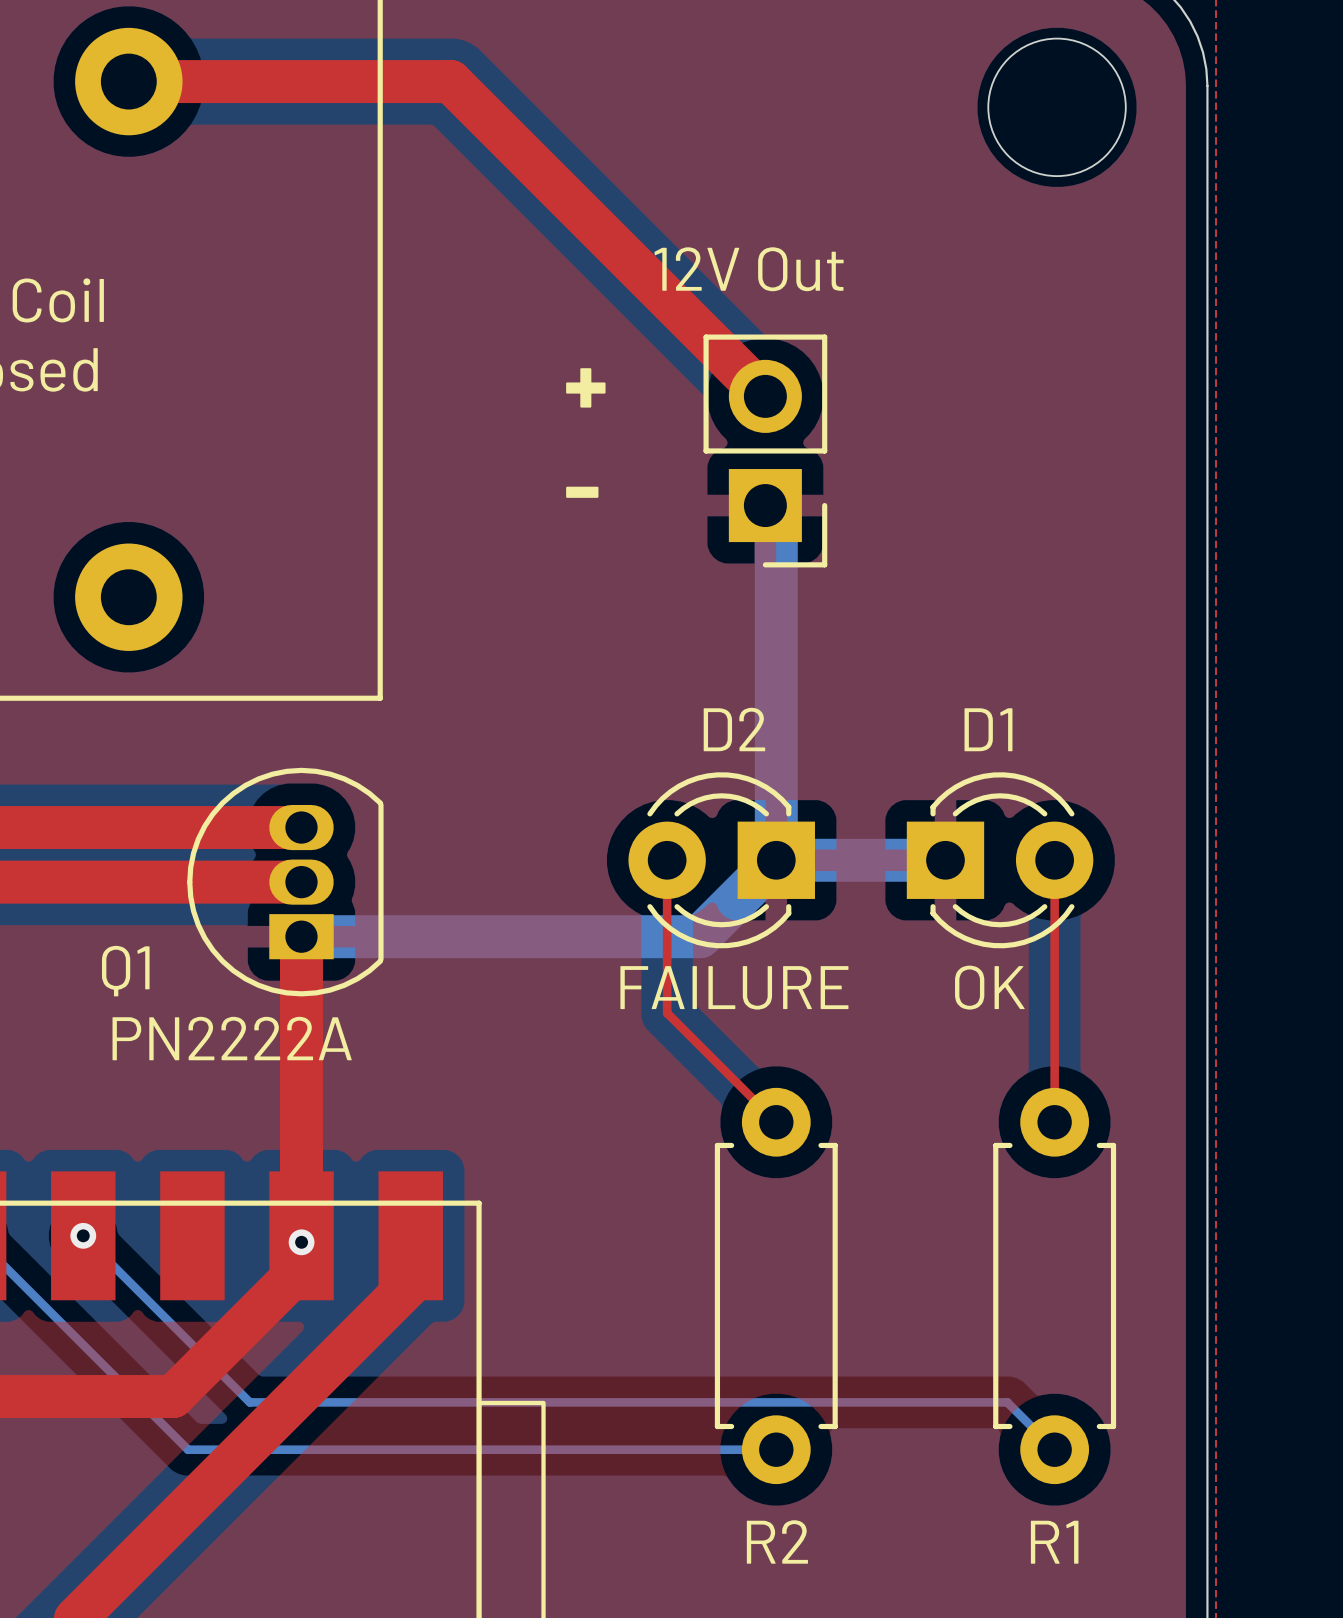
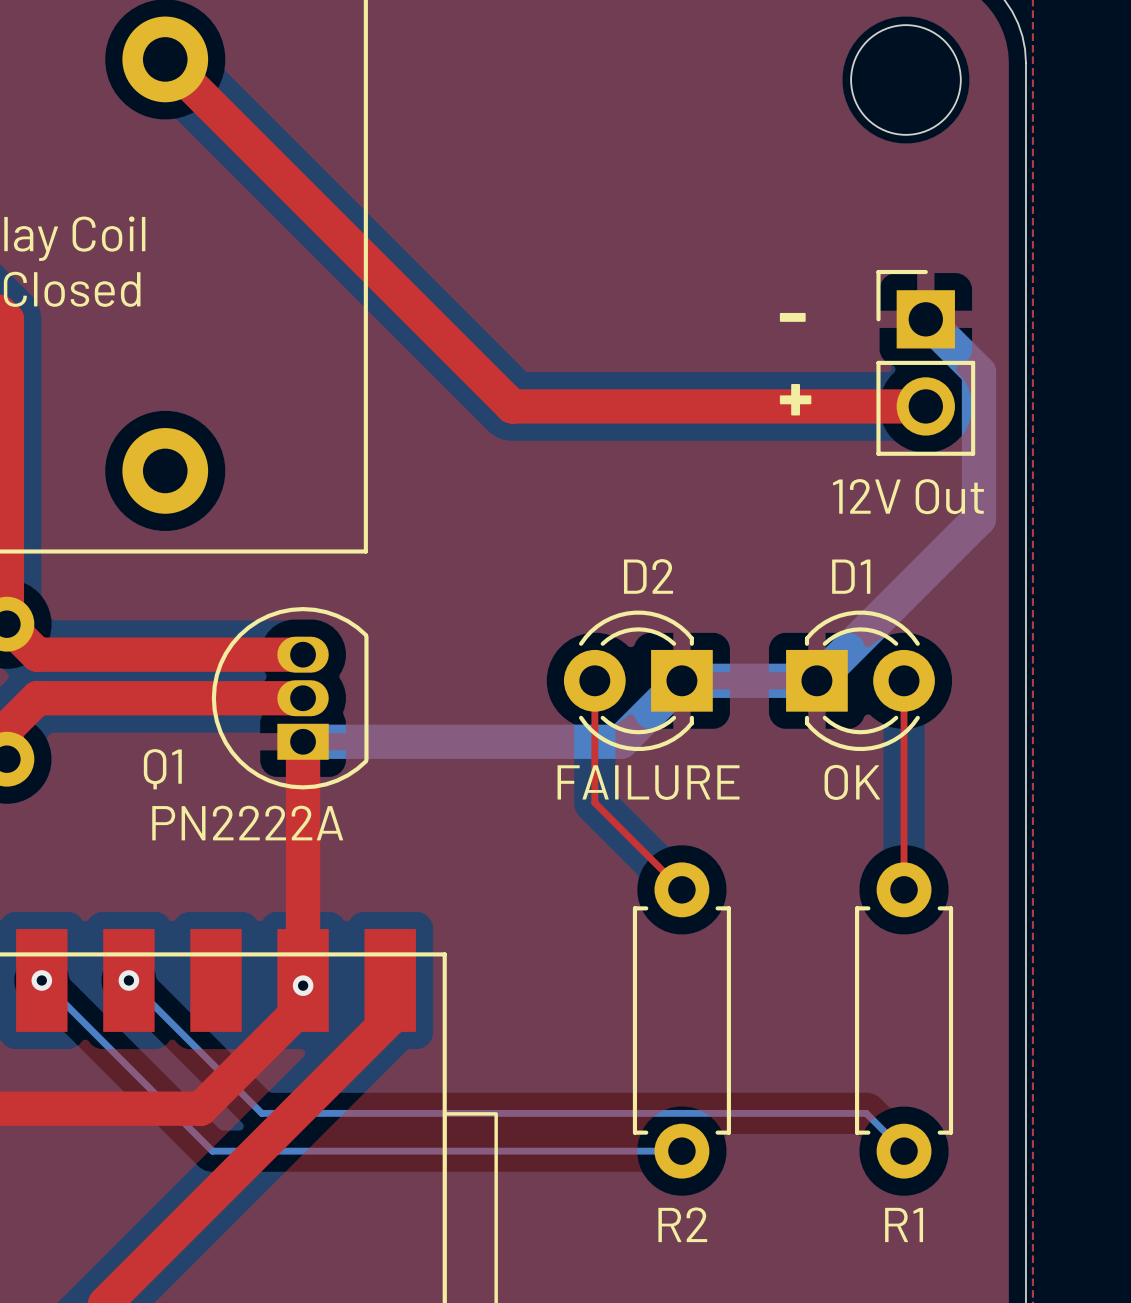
top track: (128, 81) (450, 81) (765, 396) -> (165, 59) (512, 406) (925, 406)
text position: + (585, 387) -> + (795, 399)
bottom track: none -> (925, 319) (978, 372) (978, 518) (816, 680)
part rotation: 0° (765, 450) -> 180° (925, 362)
part position: (765, 450) -> (925, 362)
text position: - (582, 492) -> - (792, 317)
bottom track: (765, 505) (776, 516) (776, 860) -> none

